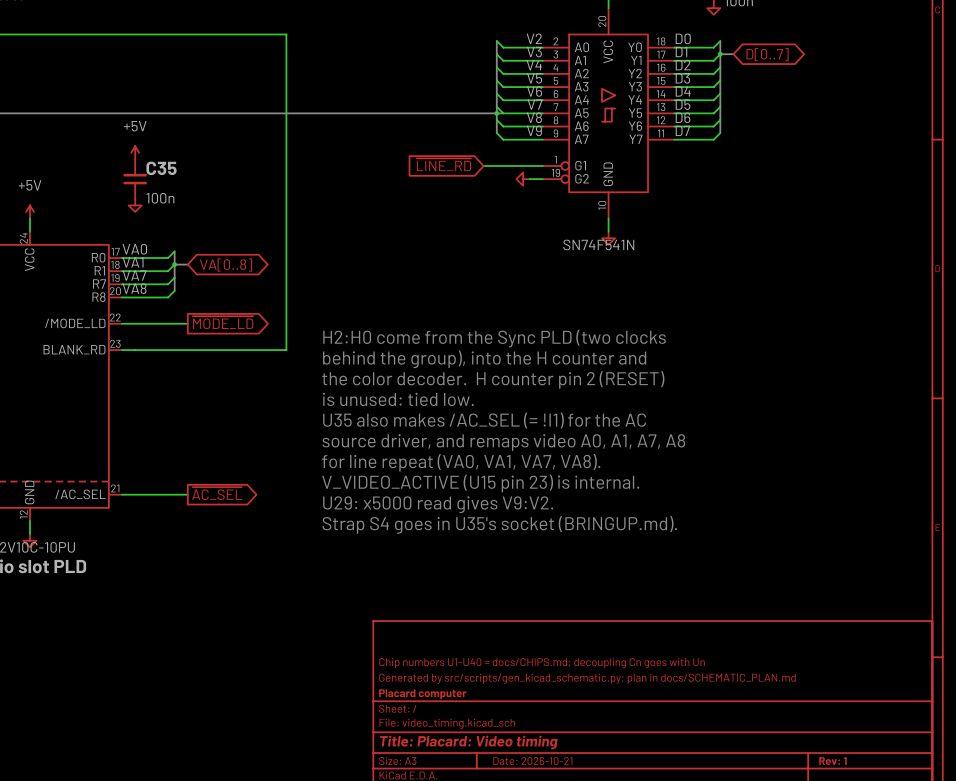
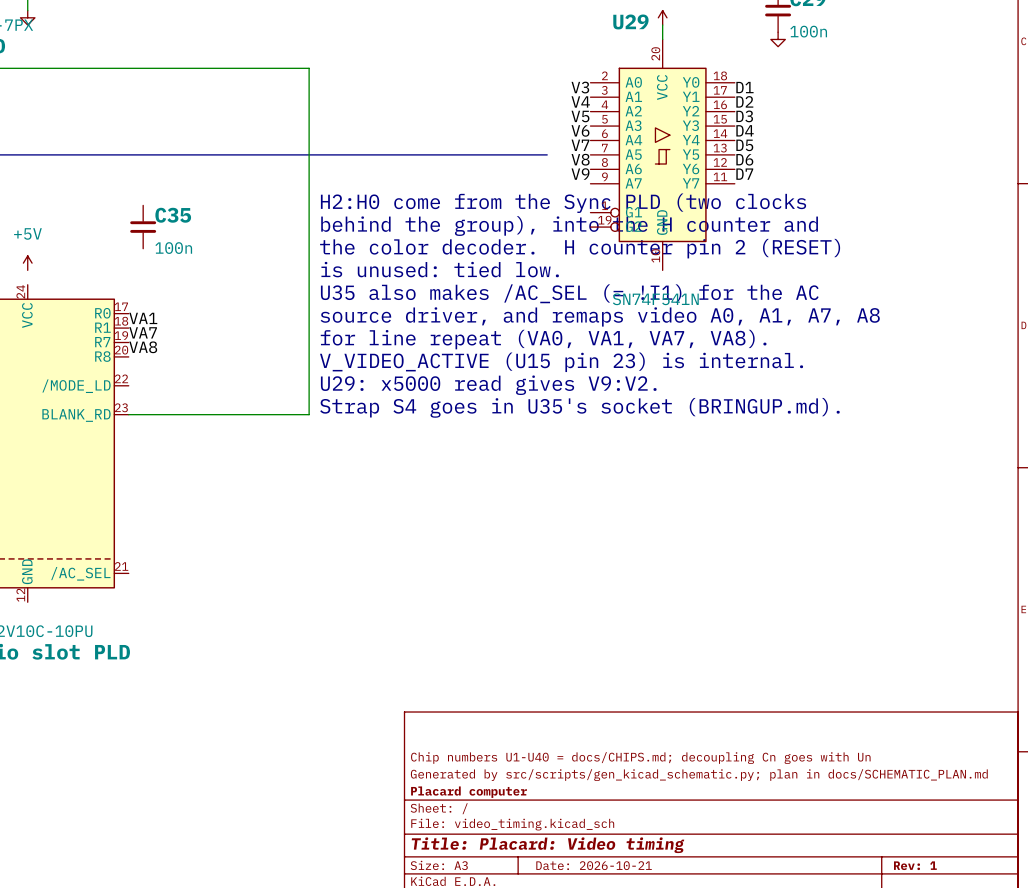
label: V2 (534, 38) -> none
label: D0 (683, 38) -> none
wire: (496, 41) (503, 47) (542, 47) -> none
bus: (496, 41) (496, 133) -> none
wire: (720, 41) (713, 47) (674, 47) -> none
bus: (720, 41) (720, 133) -> none
wire: (496, 54) (503, 60) (542, 60) -> none
wire: (720, 54) (713, 60) (674, 60) -> none
bus: (720, 54) (733, 54) -> none
junction: (720, 54) -> none
global label: D[0..7] (767, 54) -> none
wire: (496, 67) (503, 73) (542, 73) -> none
wire: (720, 67) (713, 73) (674, 73) -> none
wire: (496, 80) (503, 87) (542, 87) -> none
wire: (720, 80) (713, 87) (674, 87) -> none
wire: (496, 93) (503, 100) (542, 100) -> none
wire: (720, 93) (713, 100) (674, 100) -> none
wire: (496, 106) (503, 113) (542, 113) -> none
wire: (720, 106) (713, 113) (674, 113) -> none
junction: (496, 113) -> none
wire: (496, 119) (503, 126) (542, 126) -> none
wire: (720, 119) (713, 126) (674, 126) -> none
wire: (496, 133) (503, 139) (542, 139) -> none
wire: (720, 133) (713, 139) (674, 139) -> none
power symbol: +5V (135, 152) -> none
text: none -> H2:H0 come from the Sync PLD (two clocks (563, 203)
global label: ~{LINE_RD} (443, 164) -> none
wire: (483, 165) (542, 165) -> none
text: none -> behind the group), into the H counter and (569, 226)
power symbol: (523, 179) -> none
wire: (529, 179) (542, 179) -> none
text: none -> the color decoder. H counter pin 2 (RESET) (580, 248)
power symbol: (135, 205) -> none
wire: (30, 218) (30, 231) -> none
text: none -> is unused: tied low. (440, 269)
wire: (608, 218) (608, 231) -> none
power symbol: (608, 238) -> none
text: none -> U35 also makes /AC_SEL (= !I1) for the AC (569, 293)
label: VA0 (134, 249) -> none
wire: (174, 251) (168, 258) (122, 258) -> none
bus: (174, 251) (174, 290) -> none
text: none -> source driver, and remaps video A0, A1, A7, A8 (600, 316)
wire: (174, 264) (168, 271) (122, 271) -> none
bus: (174, 264) (187, 264) -> none
junction: (174, 264) -> none
global label: VA[0..8] (226, 264) -> none
wire: (174, 277) (168, 284) (122, 284) -> none
text: none -> for line repeat (VA0, VA1, VA7, VA8). (543, 339)
wire: (174, 290) (168, 297) (122, 297) -> none
text: none -> V_VIDEO_ACTIVE (U15 pin 23) is internal. (561, 362)
global label: ~{MODE_LD} (223, 322) -> none
wire: (122, 323) (187, 323) -> none
text: none -> U29: x5000 read gives V9:V2. (488, 385)
text: H2:H0 come from the Sync PLD (two clocks (494, 338) -> none
text: none -> Strap S4 goes in U35's socket (BRINGUP.md). (579, 407)
text: behind the group), into the H counter and (484, 359) -> none
text: the color decoder. H counter pin 2 (RESET) (493, 379) -> none
text: is unused: tied low. (398, 399) -> none
text: U35 also makes /AC_SEL (= !I1) for the AC (484, 420) -> none
text: source driver, and remaps video A0, A1, A7, A8 (503, 442) -> none
text: for line repeat (VA0, VA1, VA7, VA8). (461, 462) -> none
text: V_VIDEO_ACTIVE (U15 pin 23) is internal. (480, 483) -> none
global label: ~{AC_SEL} (217, 493) -> none
wire: (122, 494) (187, 494) -> none
text: U29: x5000 read gives V9:V2. (438, 504) -> none
wire: (30, 521) (30, 534) -> none
text: Strap S4 goes in U35's socket (BRINGUP.md). (499, 524) -> none
power symbol: (30, 540) -> none

